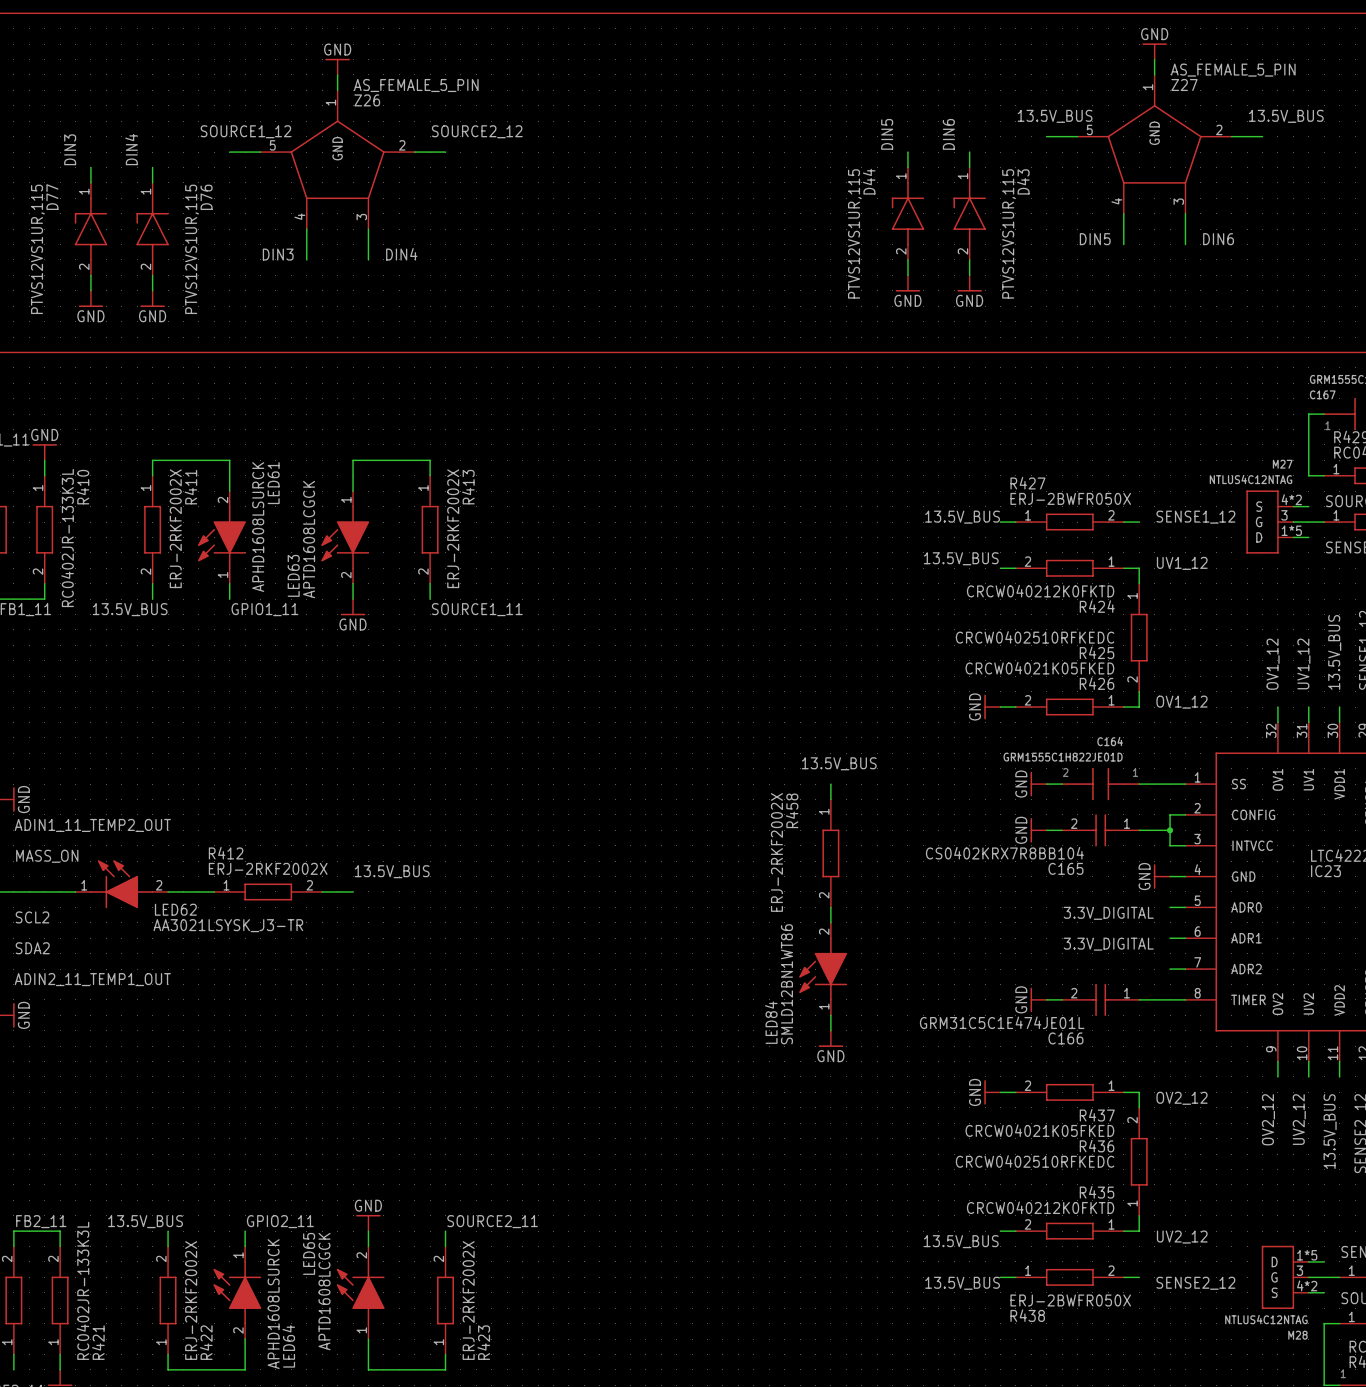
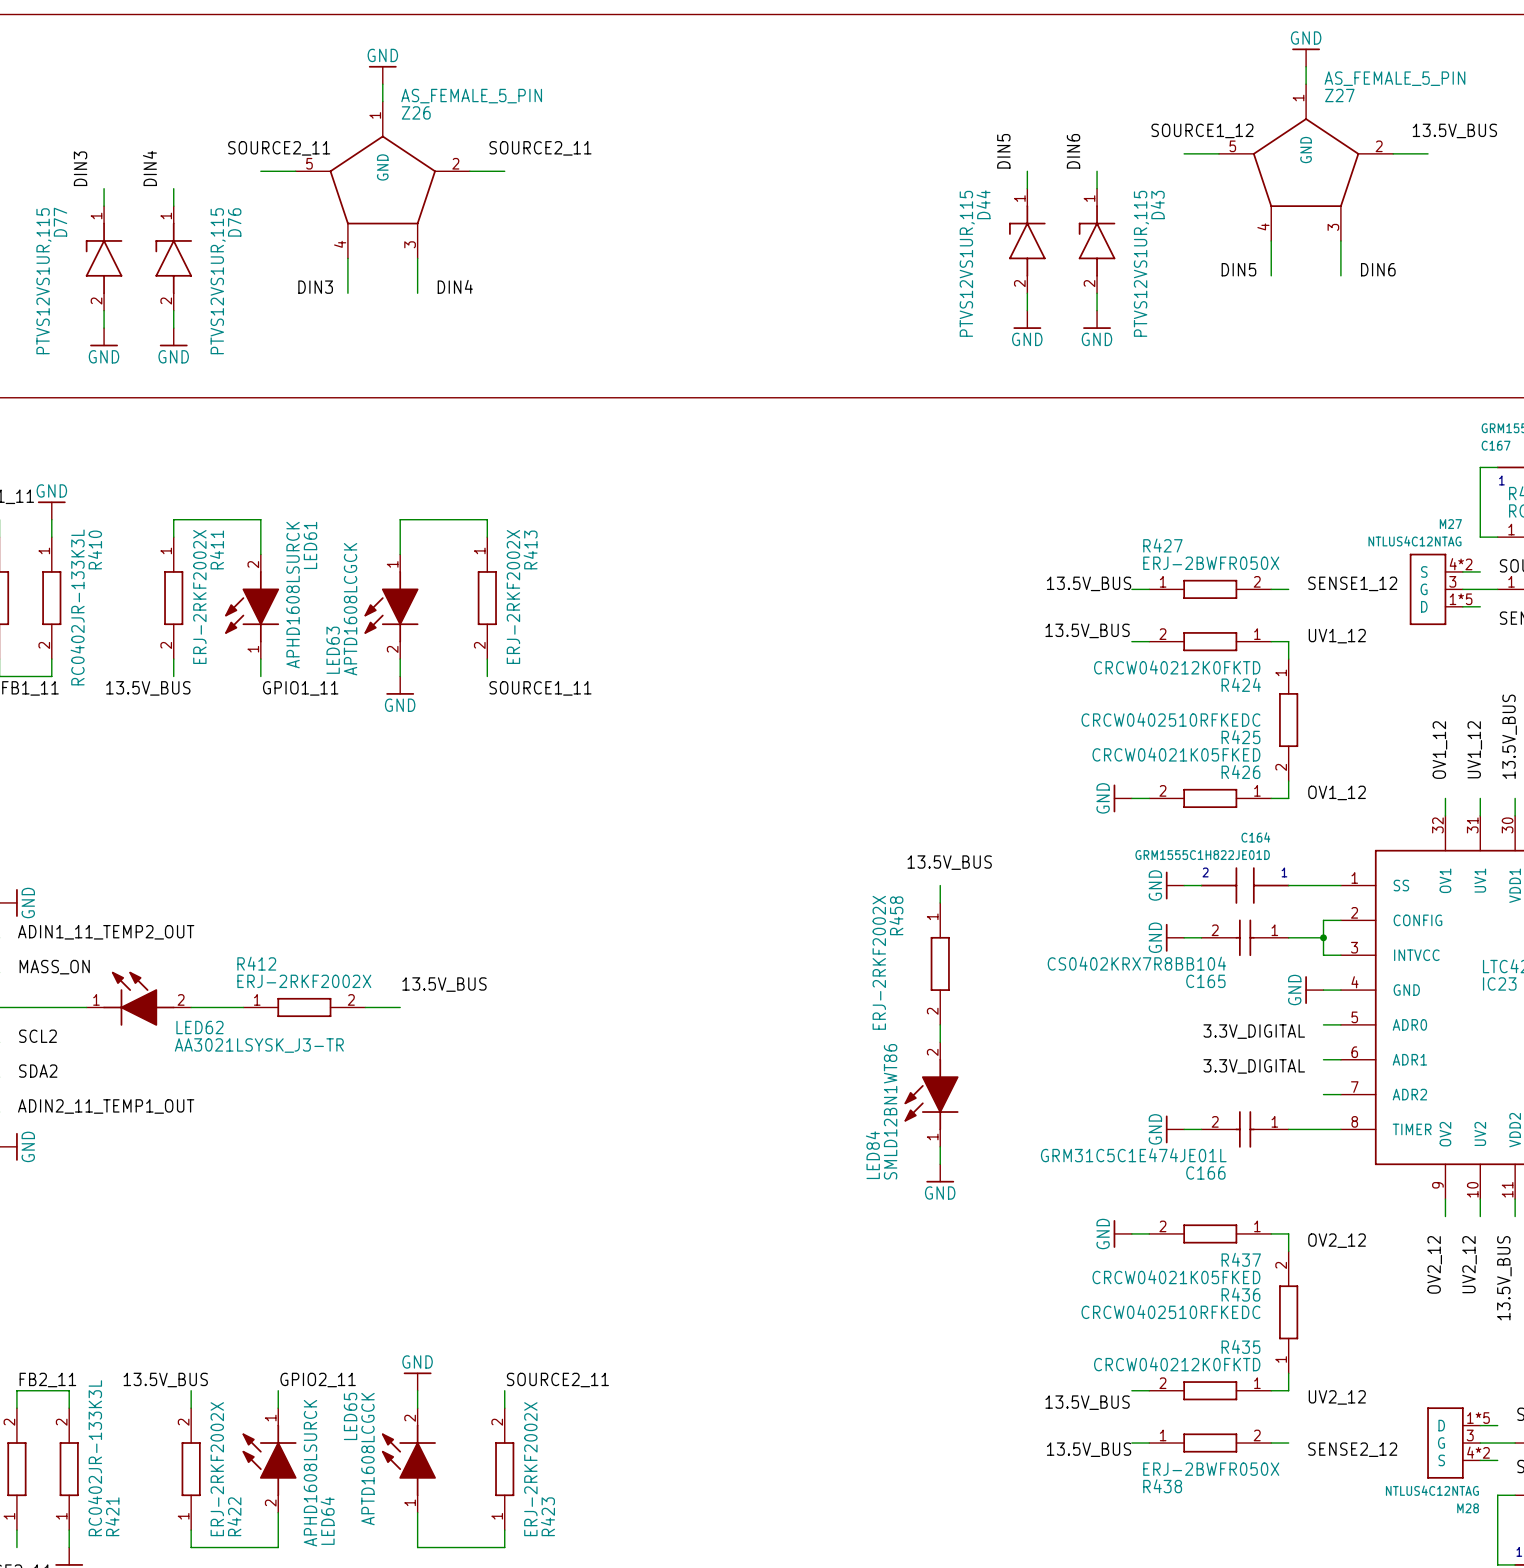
label: 13.5V_BUS (1055, 116) -> SOURCE1_12 (1202, 130)
label: SOURCE1_12 (245, 131) -> SOURCE2_11 (279, 148)
label: SOURCE2_12 (477, 131) -> SOURCE2_11 (540, 148)

